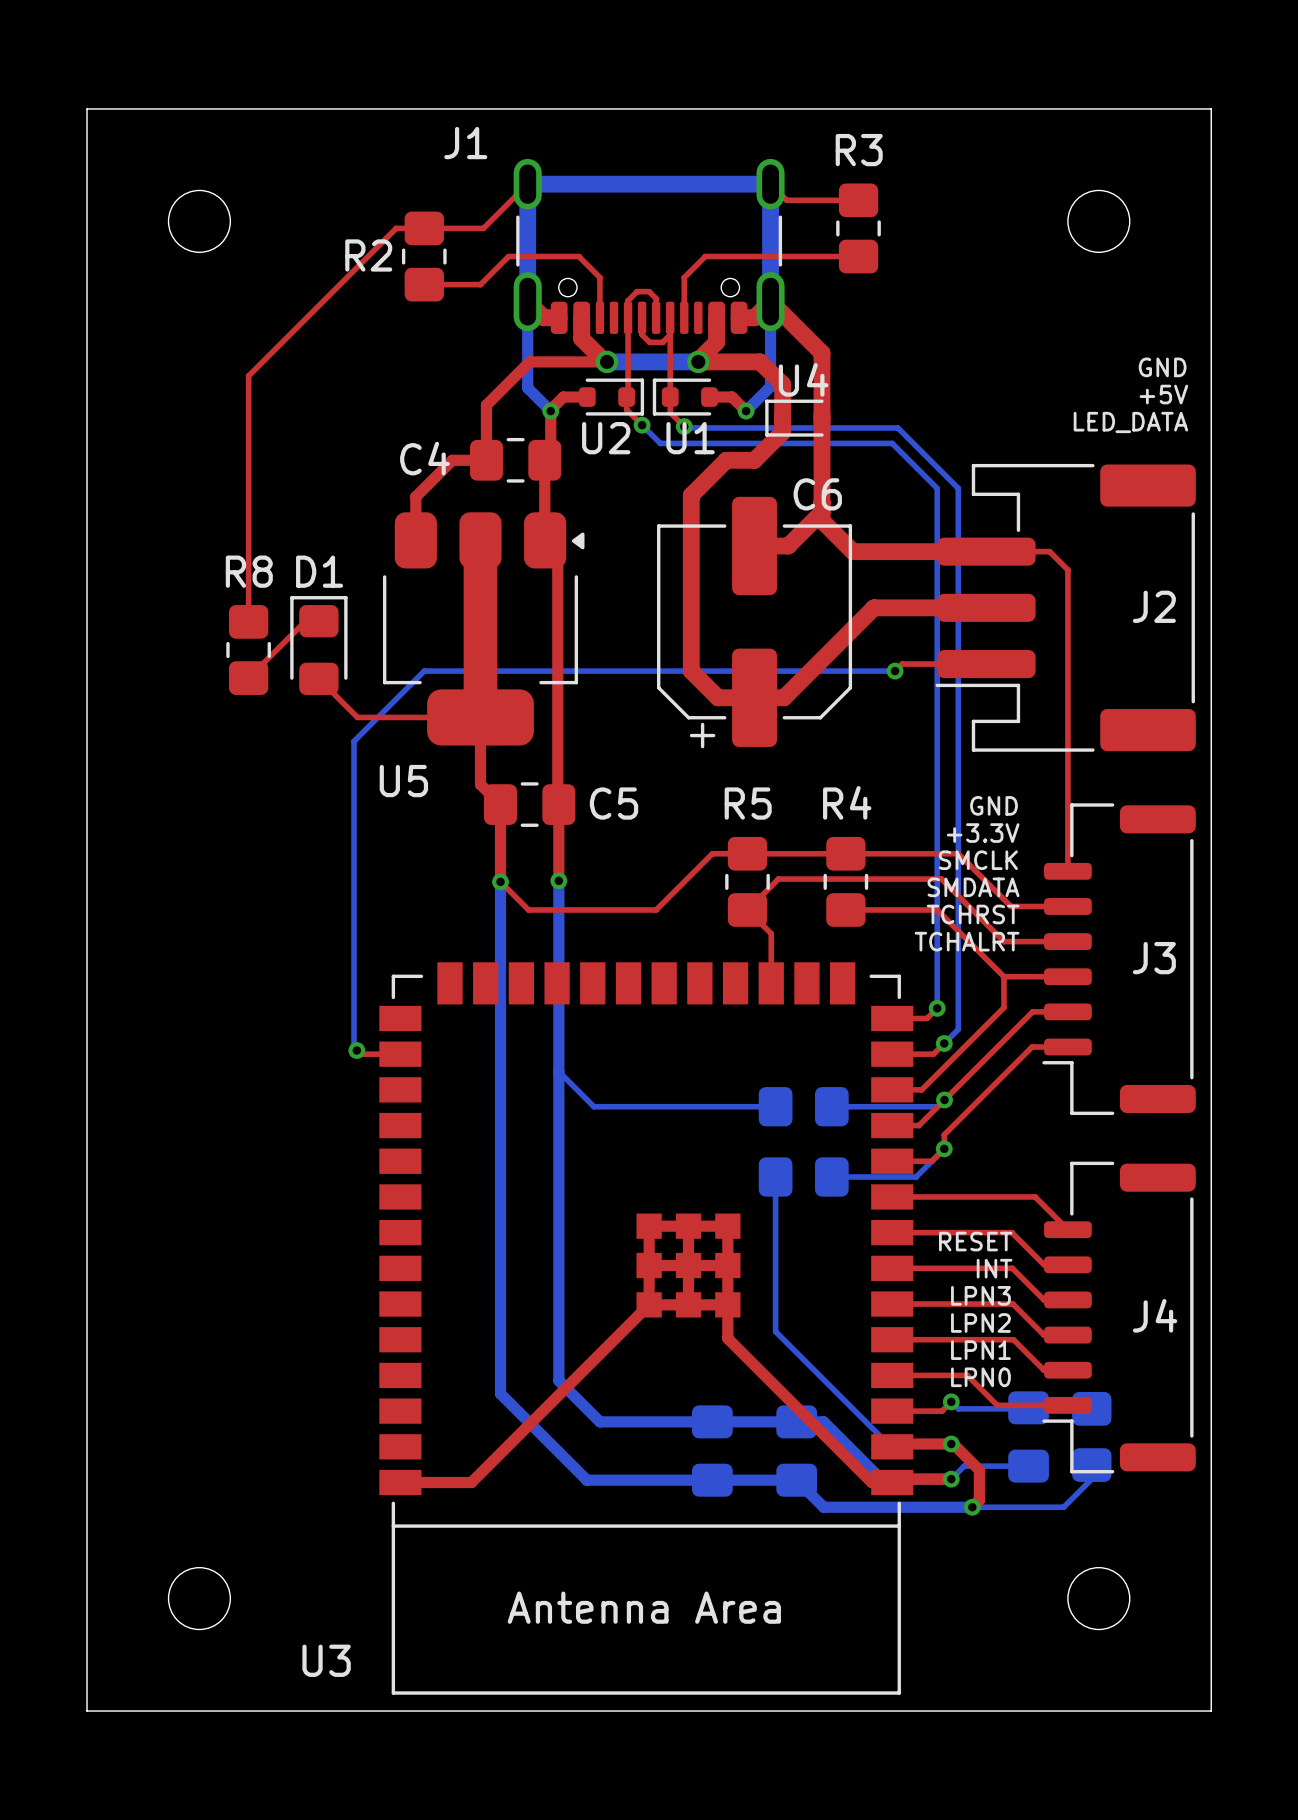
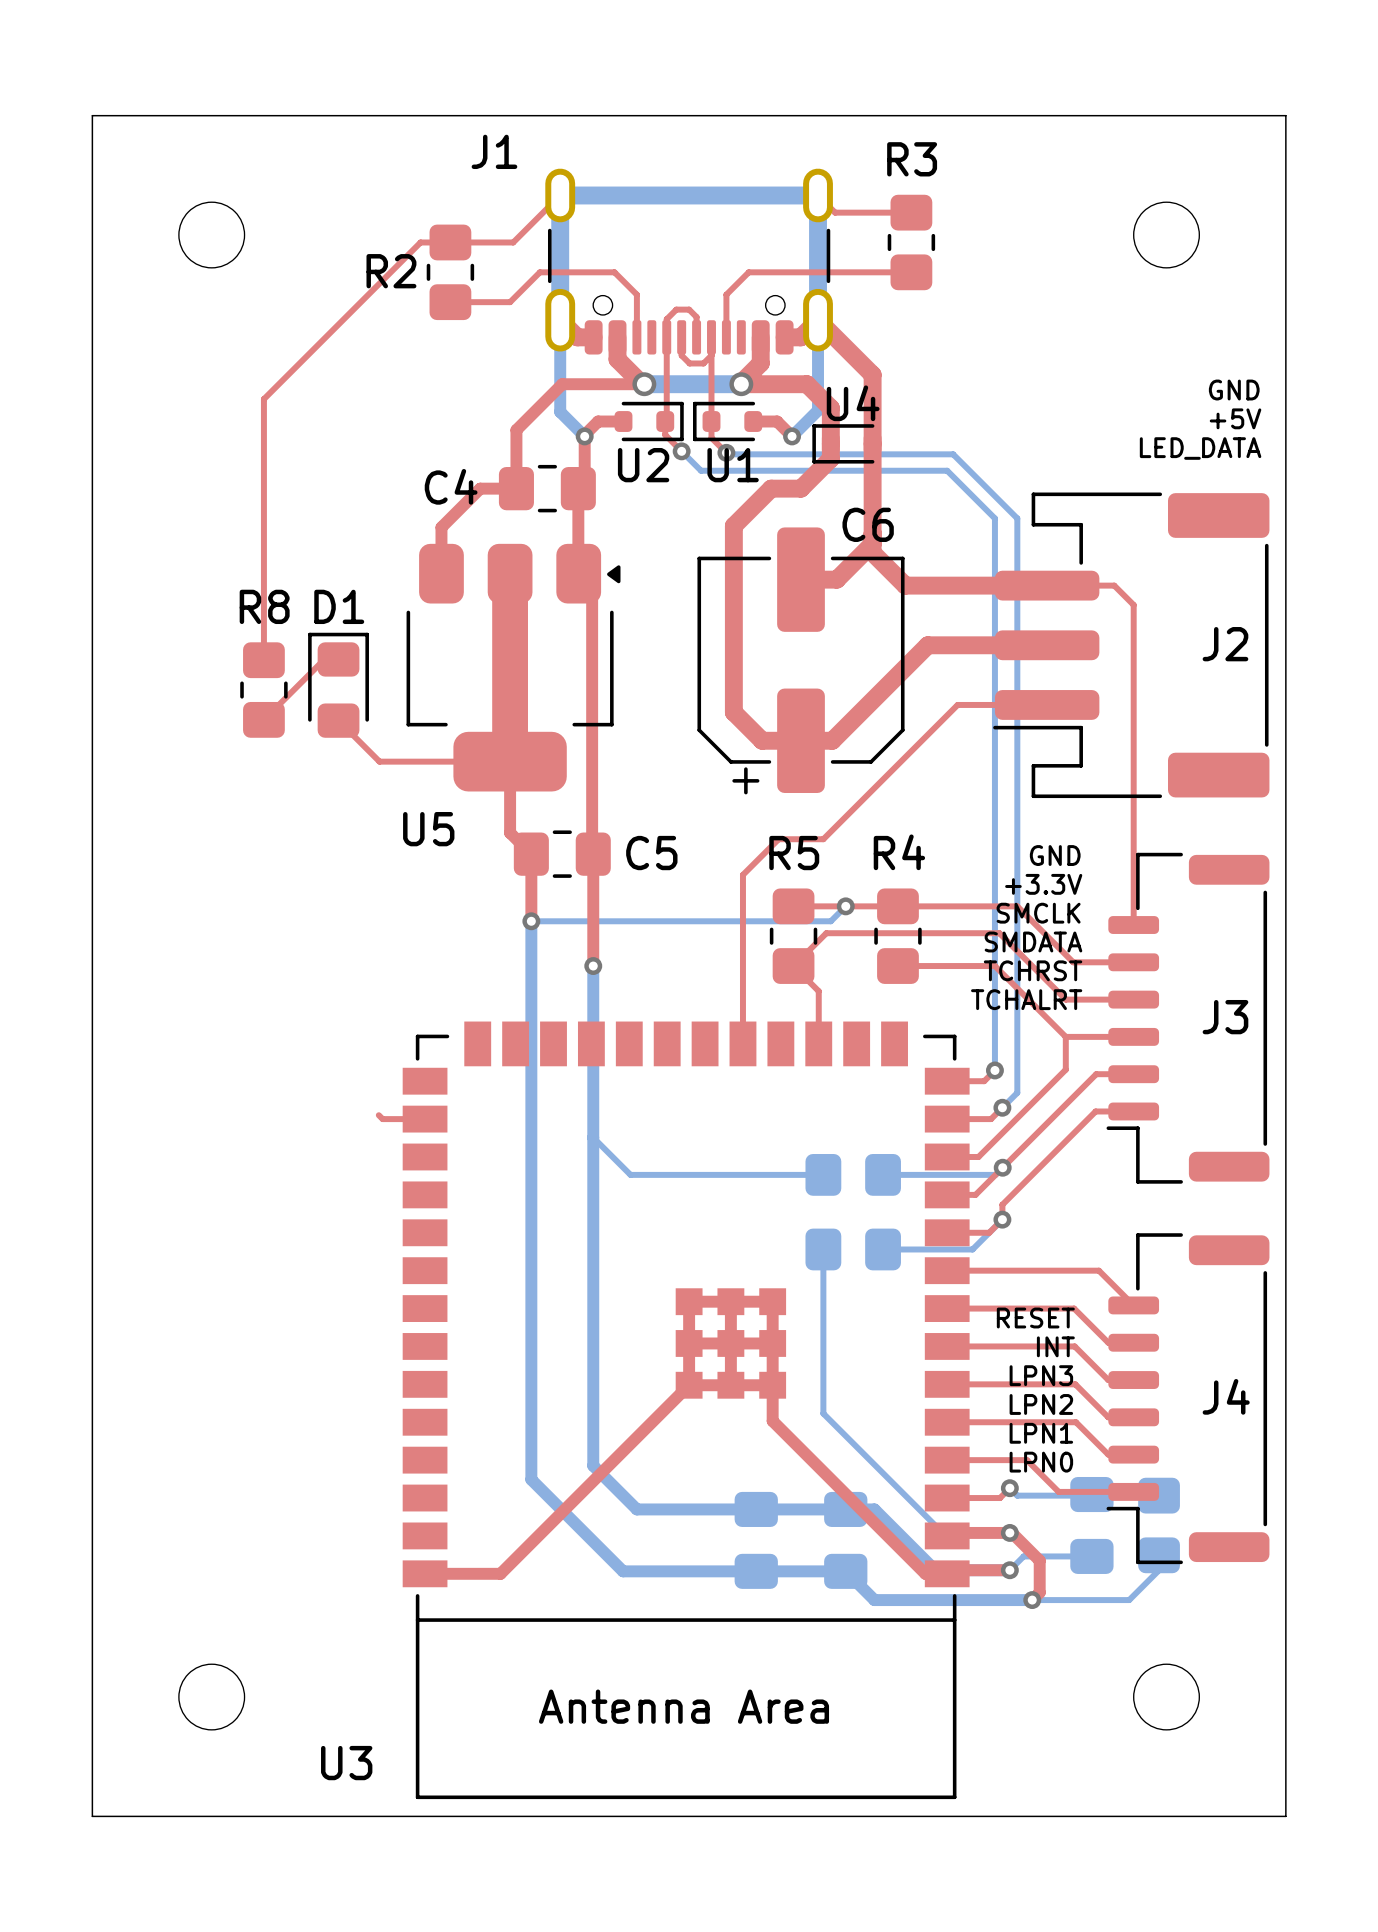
top track: none -> (950, 712) (823, 839) (778, 839) (742, 874) (742, 1043)
bottom track: (895, 671) (424, 671) (354, 741) (354, 1047) (356, 1050) -> none
via: (895, 671) -> none
top track: (747, 853) (712, 853) (656, 909) (528, 909) (500, 881) (500, 867) -> none
bottom track: none -> (845, 906) (830, 921) (531, 921) (531, 936)
via: none -> (845, 906)
top track: none -> (593, 935) (593, 966)
bottom track: (558, 880) (558, 909) -> none
via position: (558, 880) -> (593, 966)
via position: (500, 881) -> (531, 921)
via: (356, 1050) -> none

